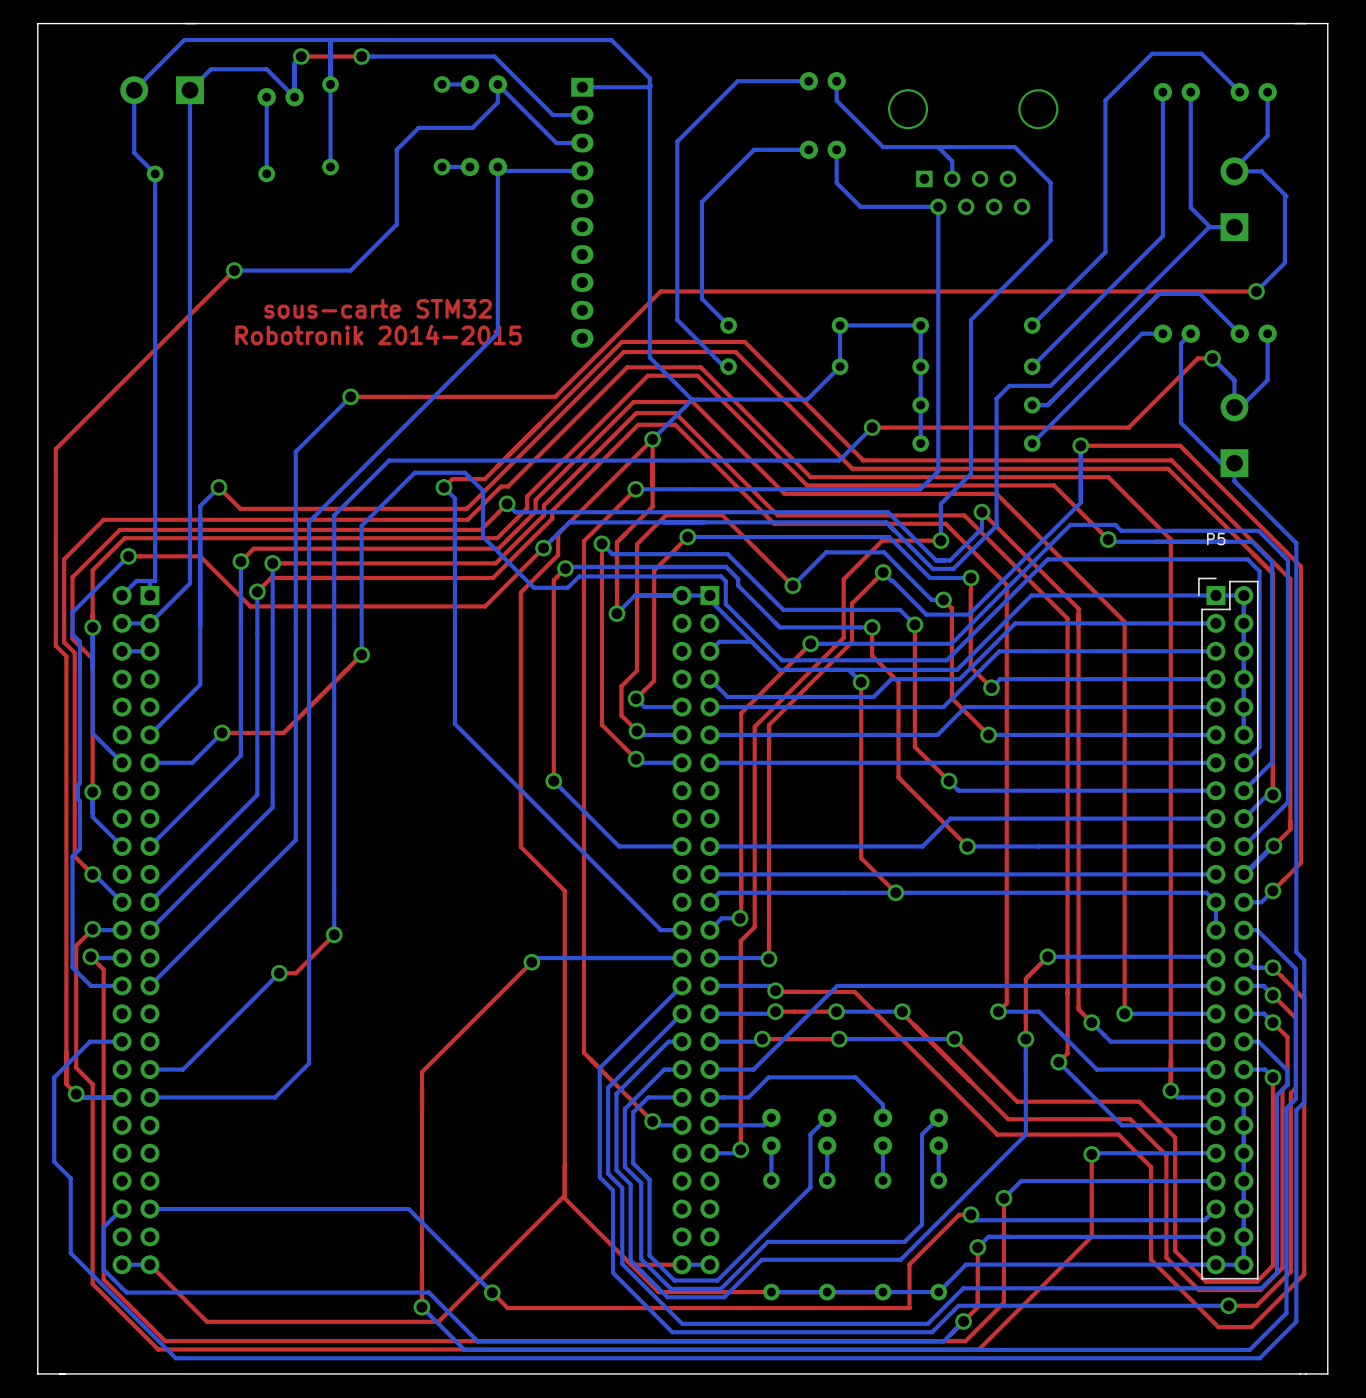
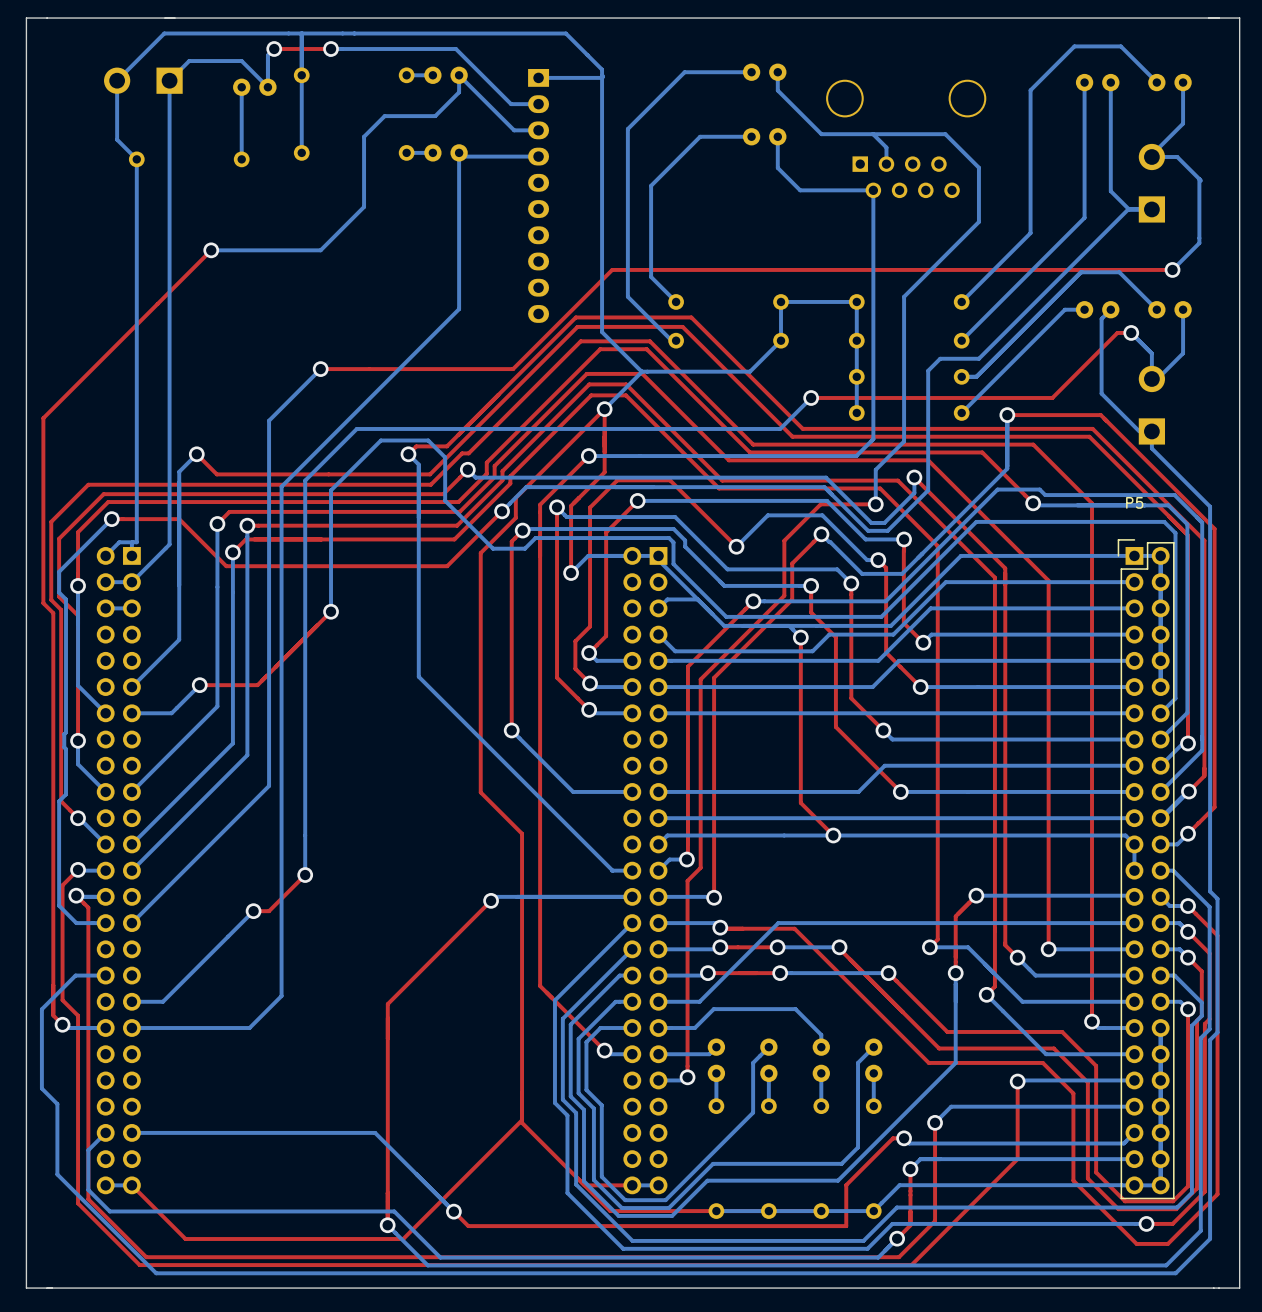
text: sous-carte STM32 (378, 308) -> none
text: Robotronik 2014-2015 (378, 334) -> none

